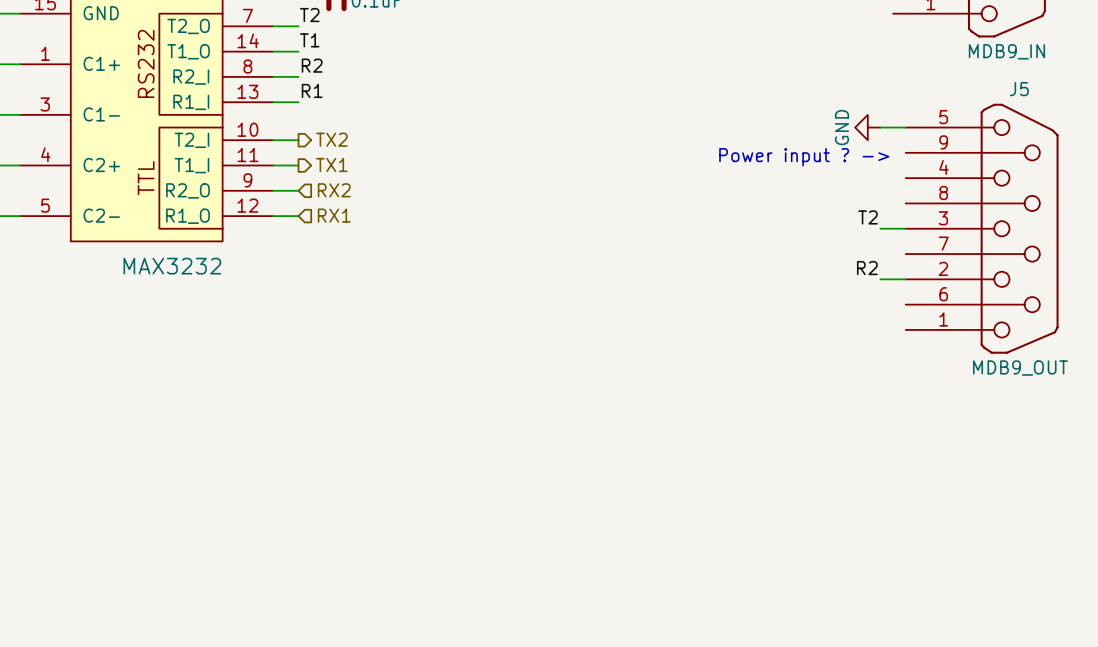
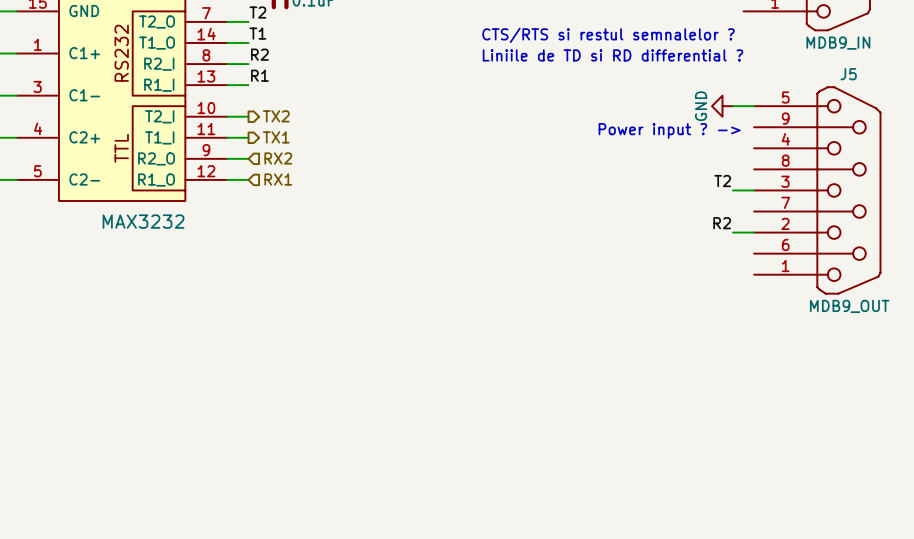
text: none -> CTS/RTS si restul semnalelor ? (608, 35)
text: none -> Liniile de TD si RD differential ? (613, 55)

